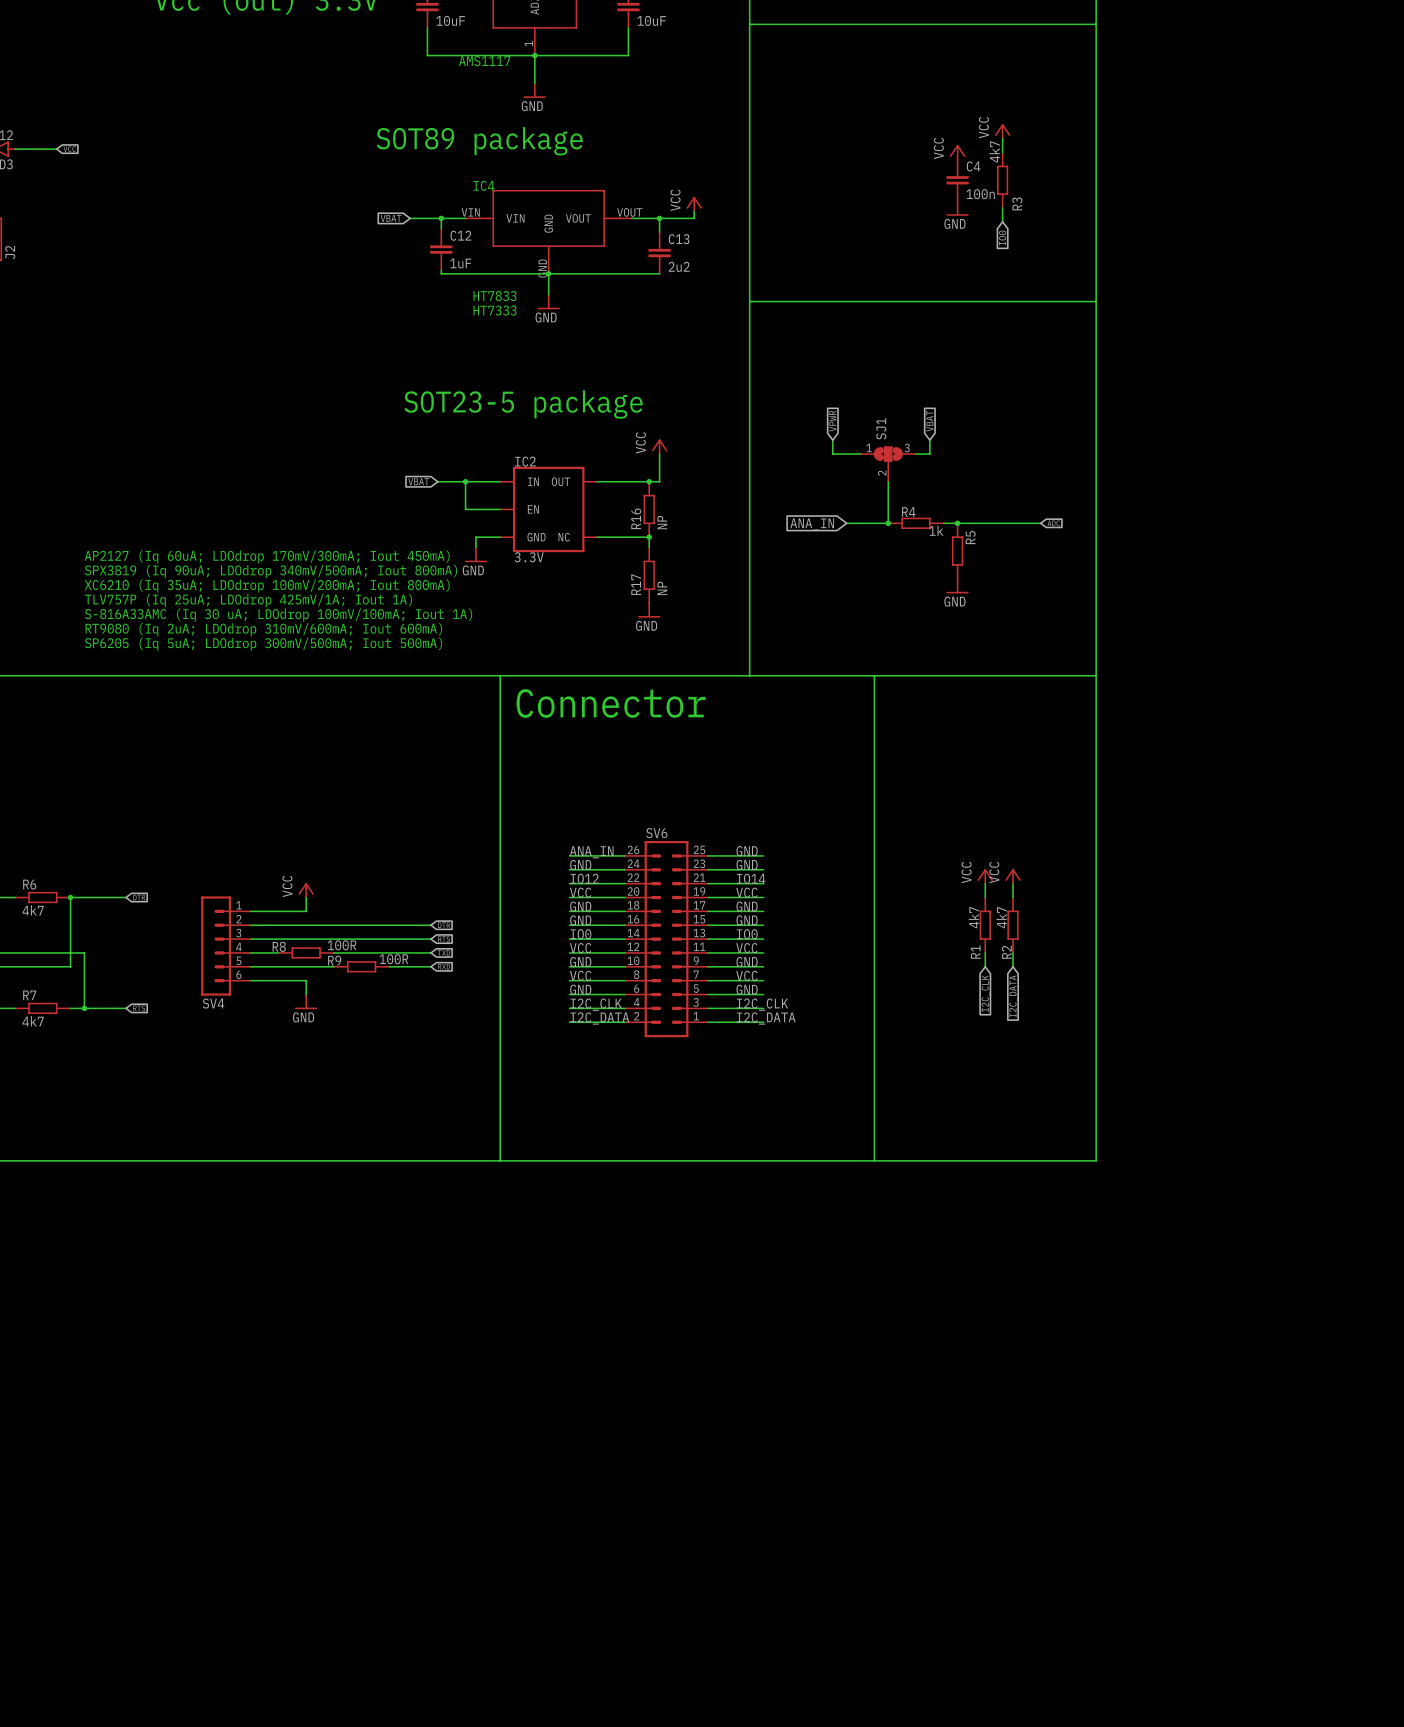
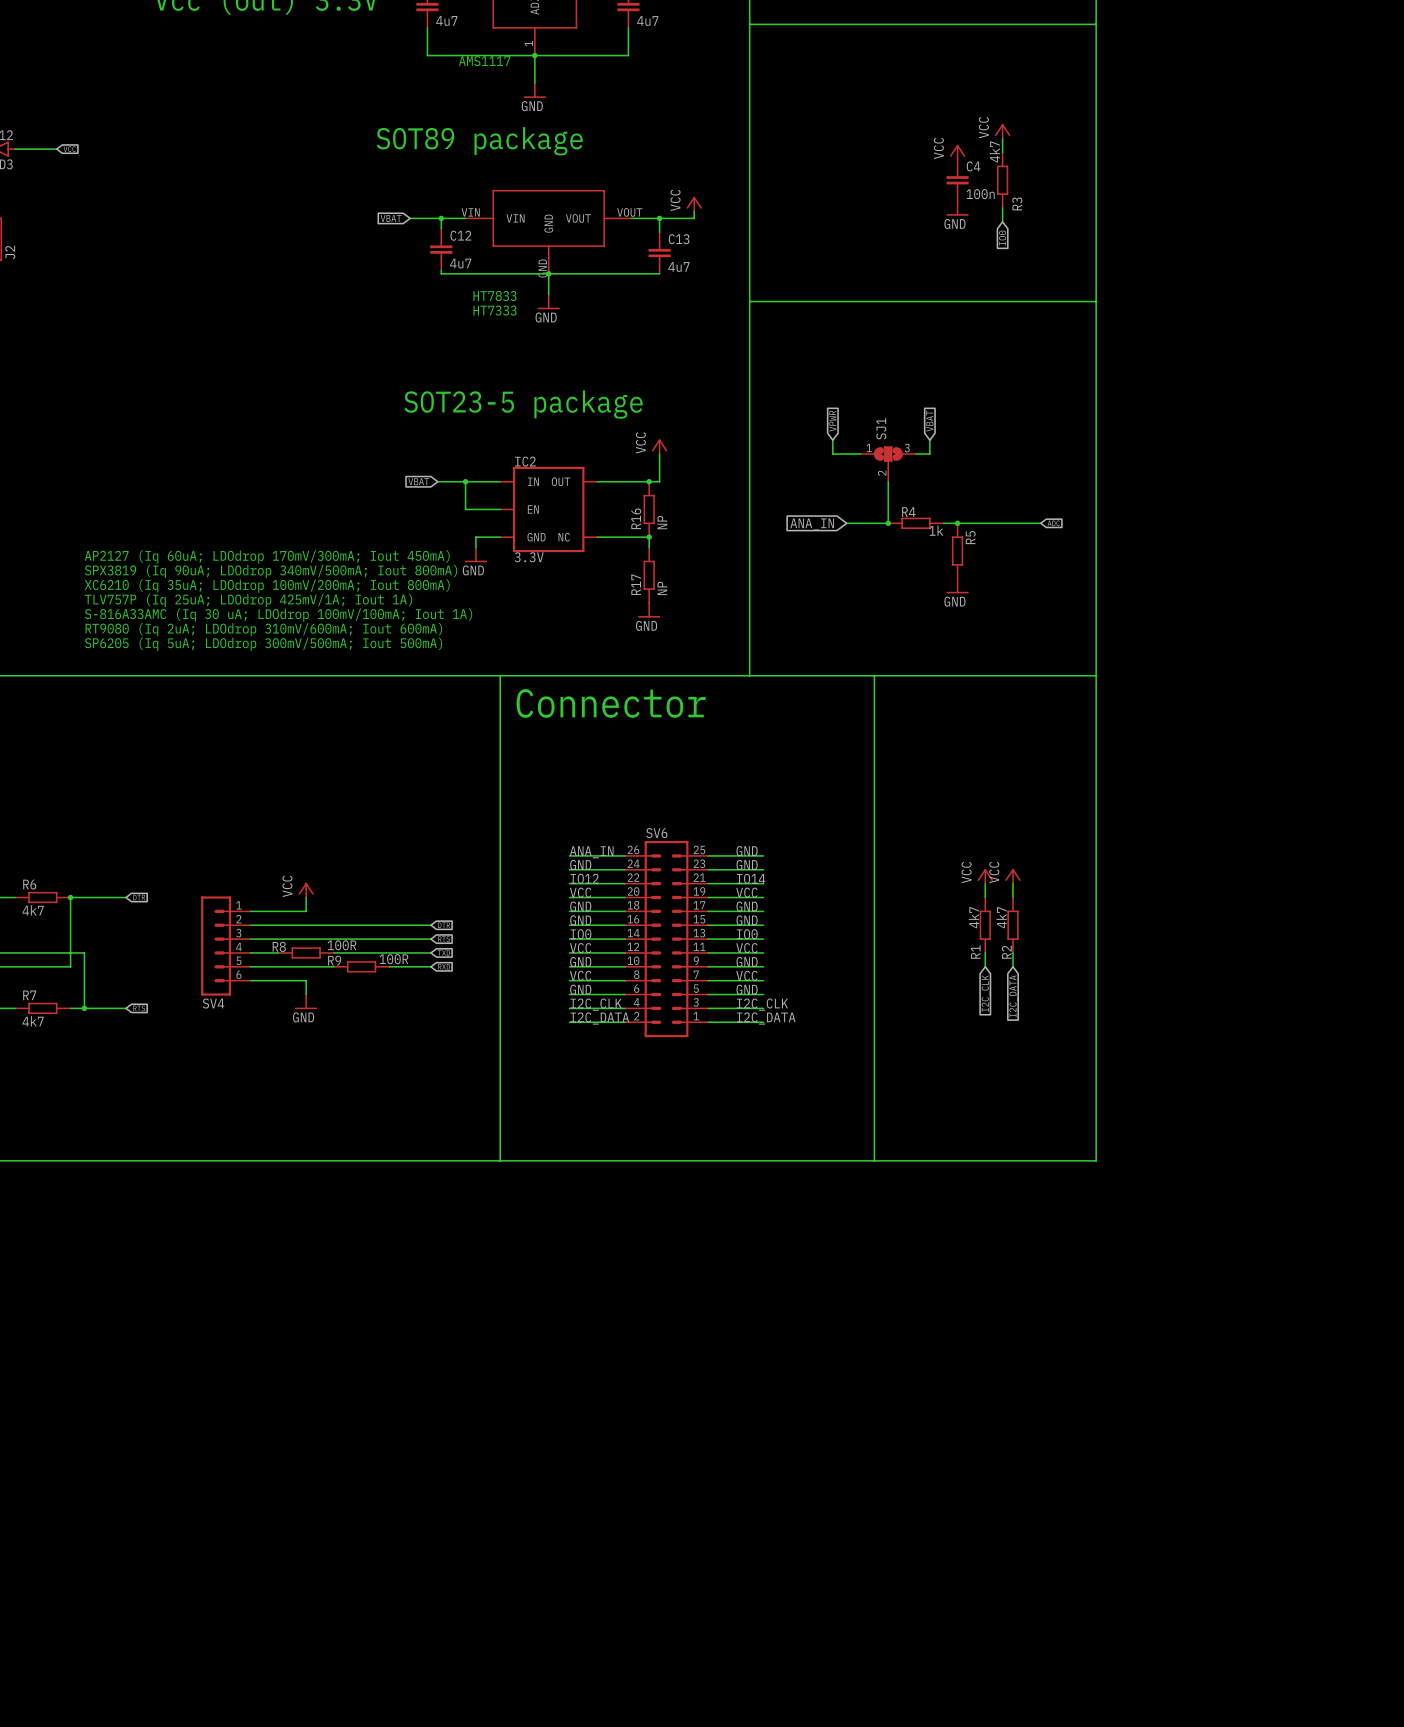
part value: 10uF (450, 20) -> 4u7 (446, 20)
part value: 10uF (651, 20) -> 4u7 (647, 20)
text: IC4 (484, 185) -> none
C12 value: 1uF (460, 263) -> 4u7 (460, 263)
C13 value: 2u2 (679, 266) -> 4u7 (678, 267)

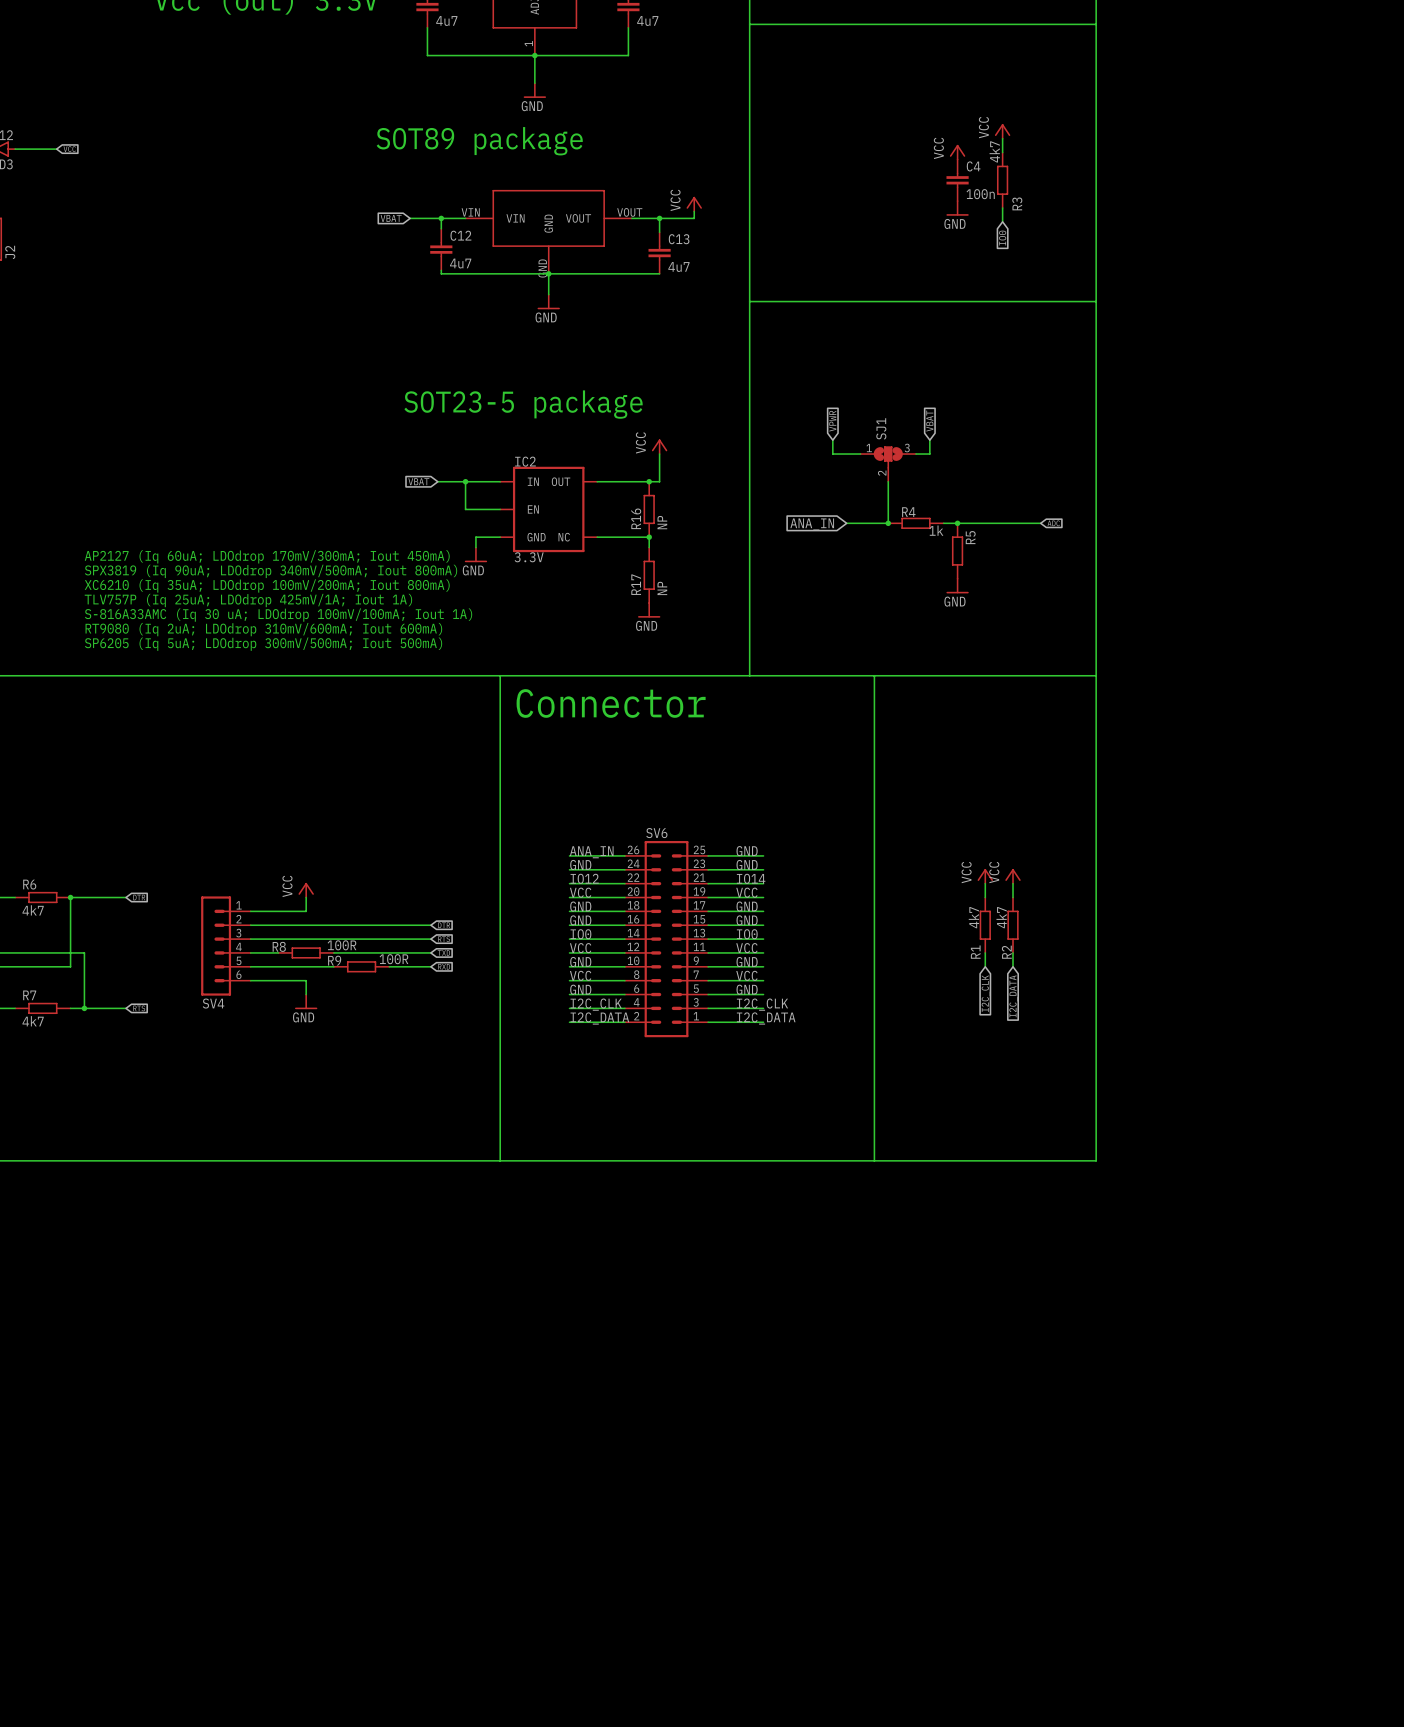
text: AMS1117 (484, 61) -> none
text: HT7833 (494, 296) -> none
text: HT7333 (494, 310) -> none

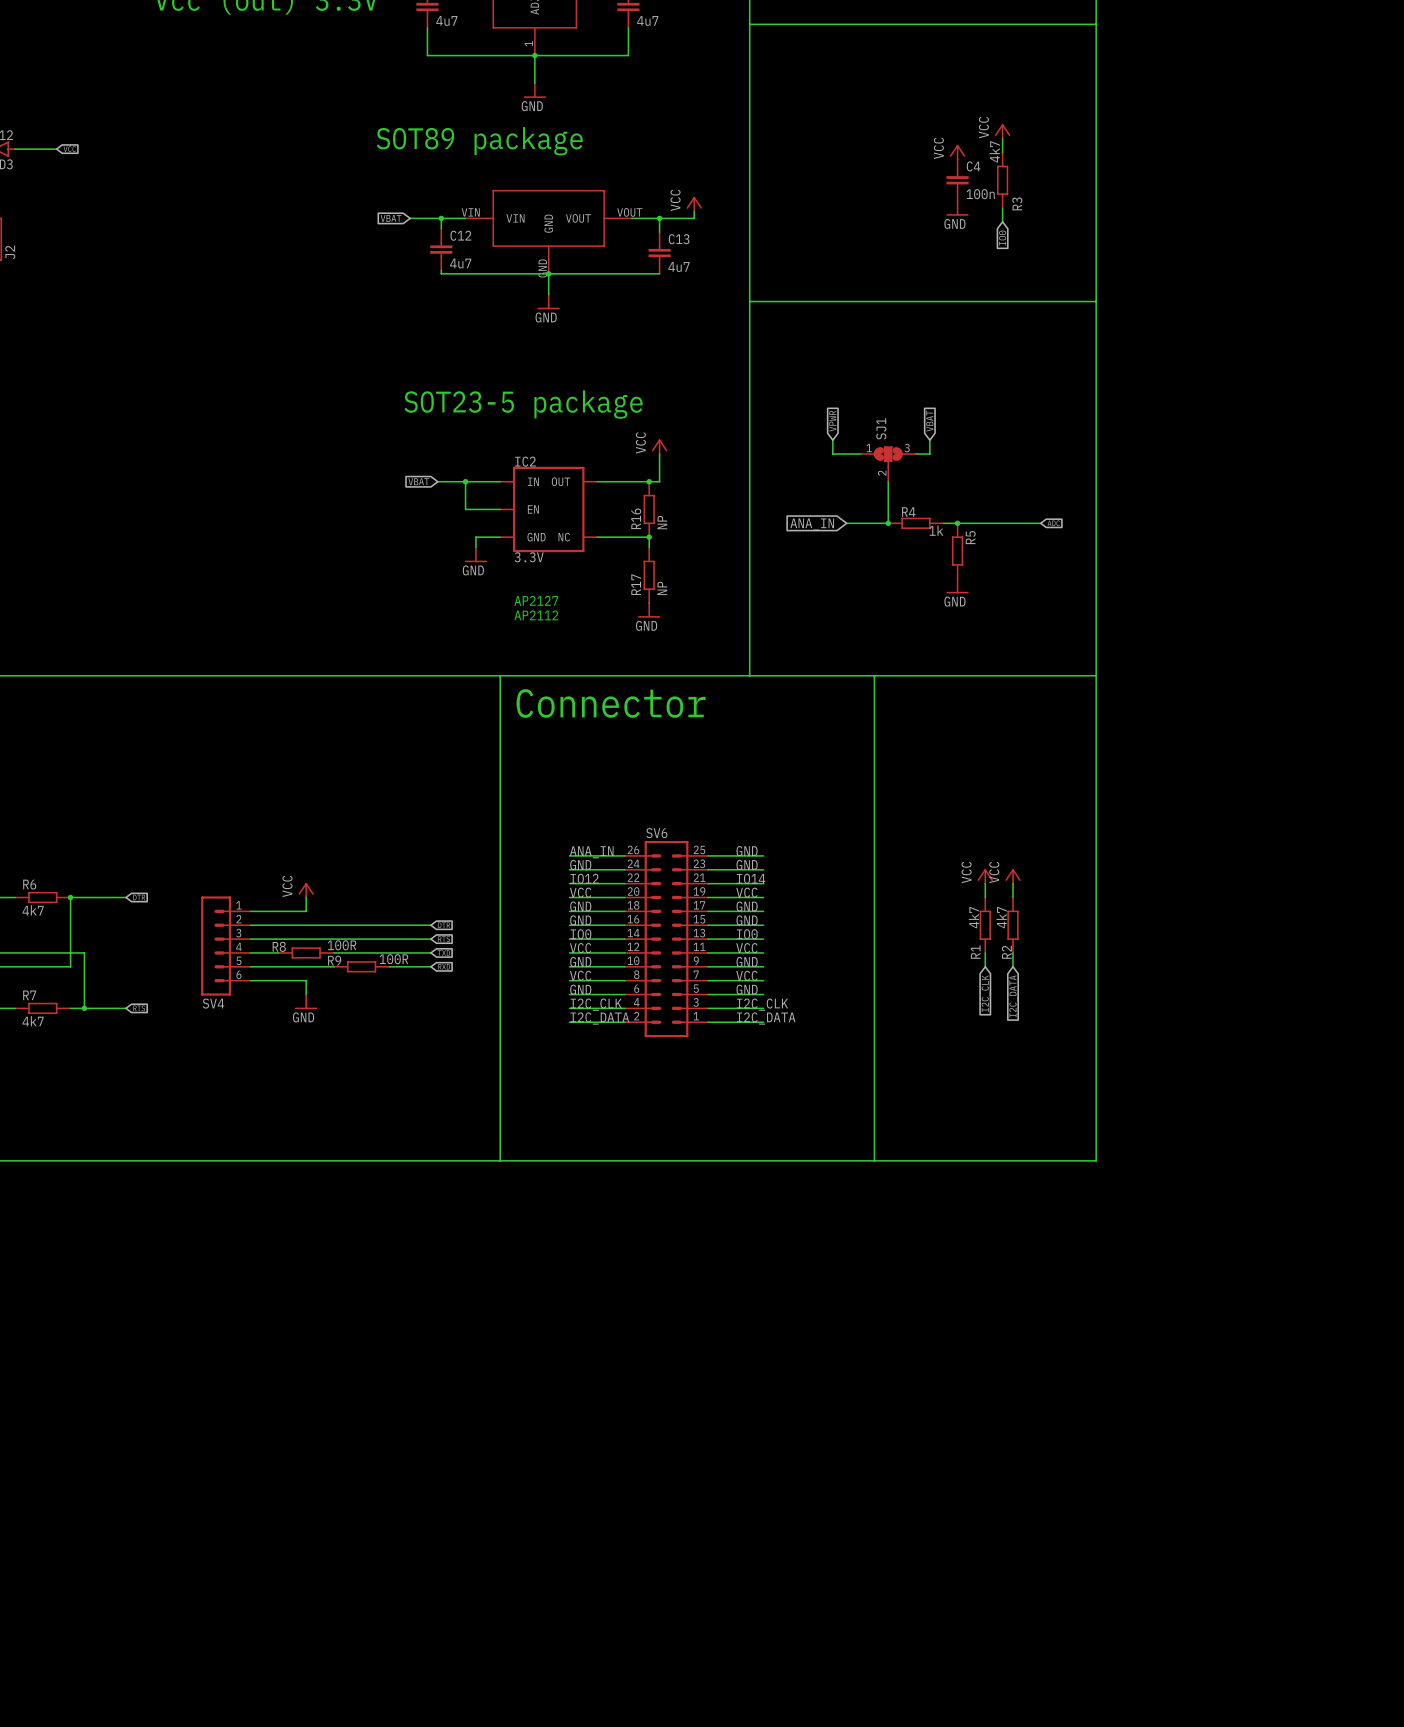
text: AP2127 (Iq 60uA; LDOdrop 170mV/300mA; Iout 450mA) (267, 556) -> none
text: SPX3819 (Iq 90uA; LDOdrop 340mV/500mA; Iout 800mA) (271, 571) -> none
text: XC6210 (Iq 35uA; LDOdrop 100mV/200mA; Iout 800mA) (267, 585) -> none
text: TLV757P (Iq 25uA; LDOdrop 425mV/1A; Iout 1A) (248, 600) -> none
text: none -> AP2127 (536, 600)
text: S-816A33AMC (Iq 30 uA; LDOdrop 100mV/100mA; Iout 1A) (278, 615) -> none
text: none -> AP2112 (536, 615)
text: RT9080 (Iq 2uA; LDOdrop 310mV/600mA; Iout 600mA) (263, 629) -> none
text: SP6205 (Iq 5uA; LDOdrop 300mV/500mA; Iout 500mA) (263, 644) -> none

